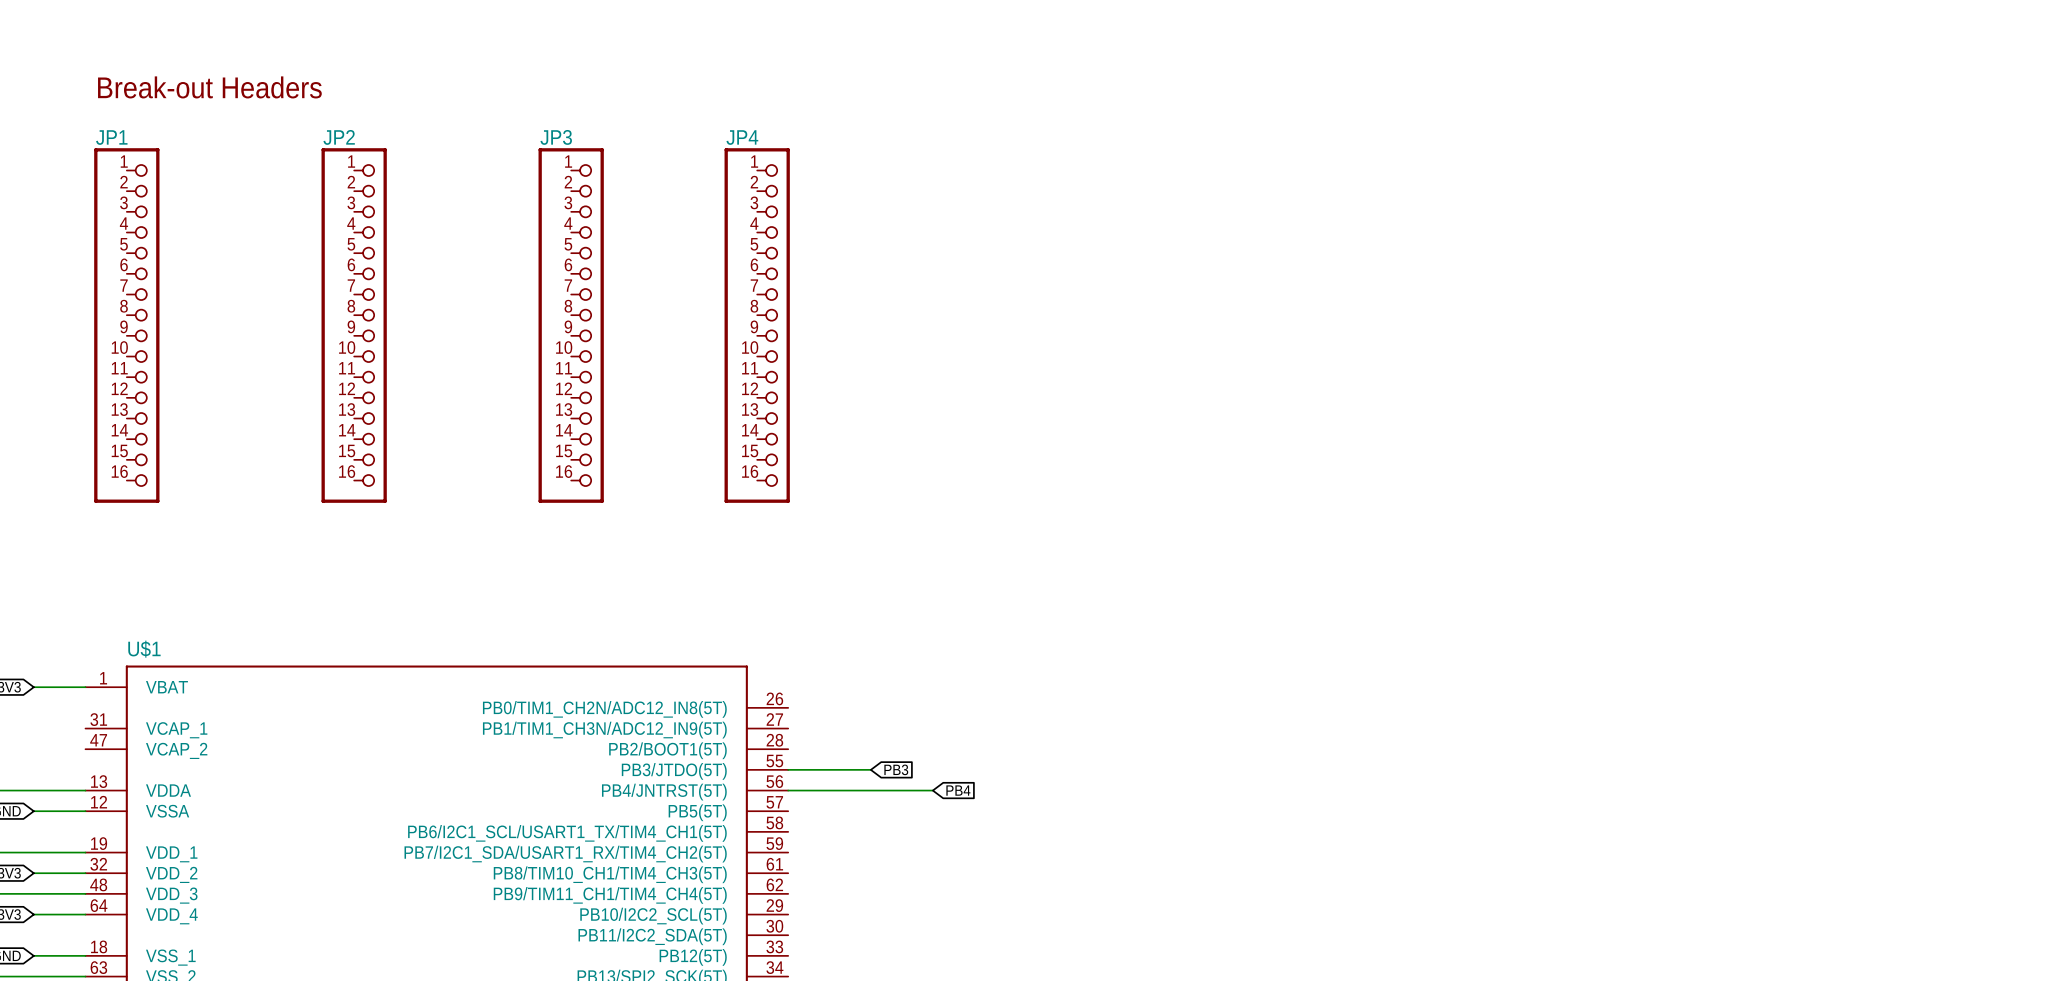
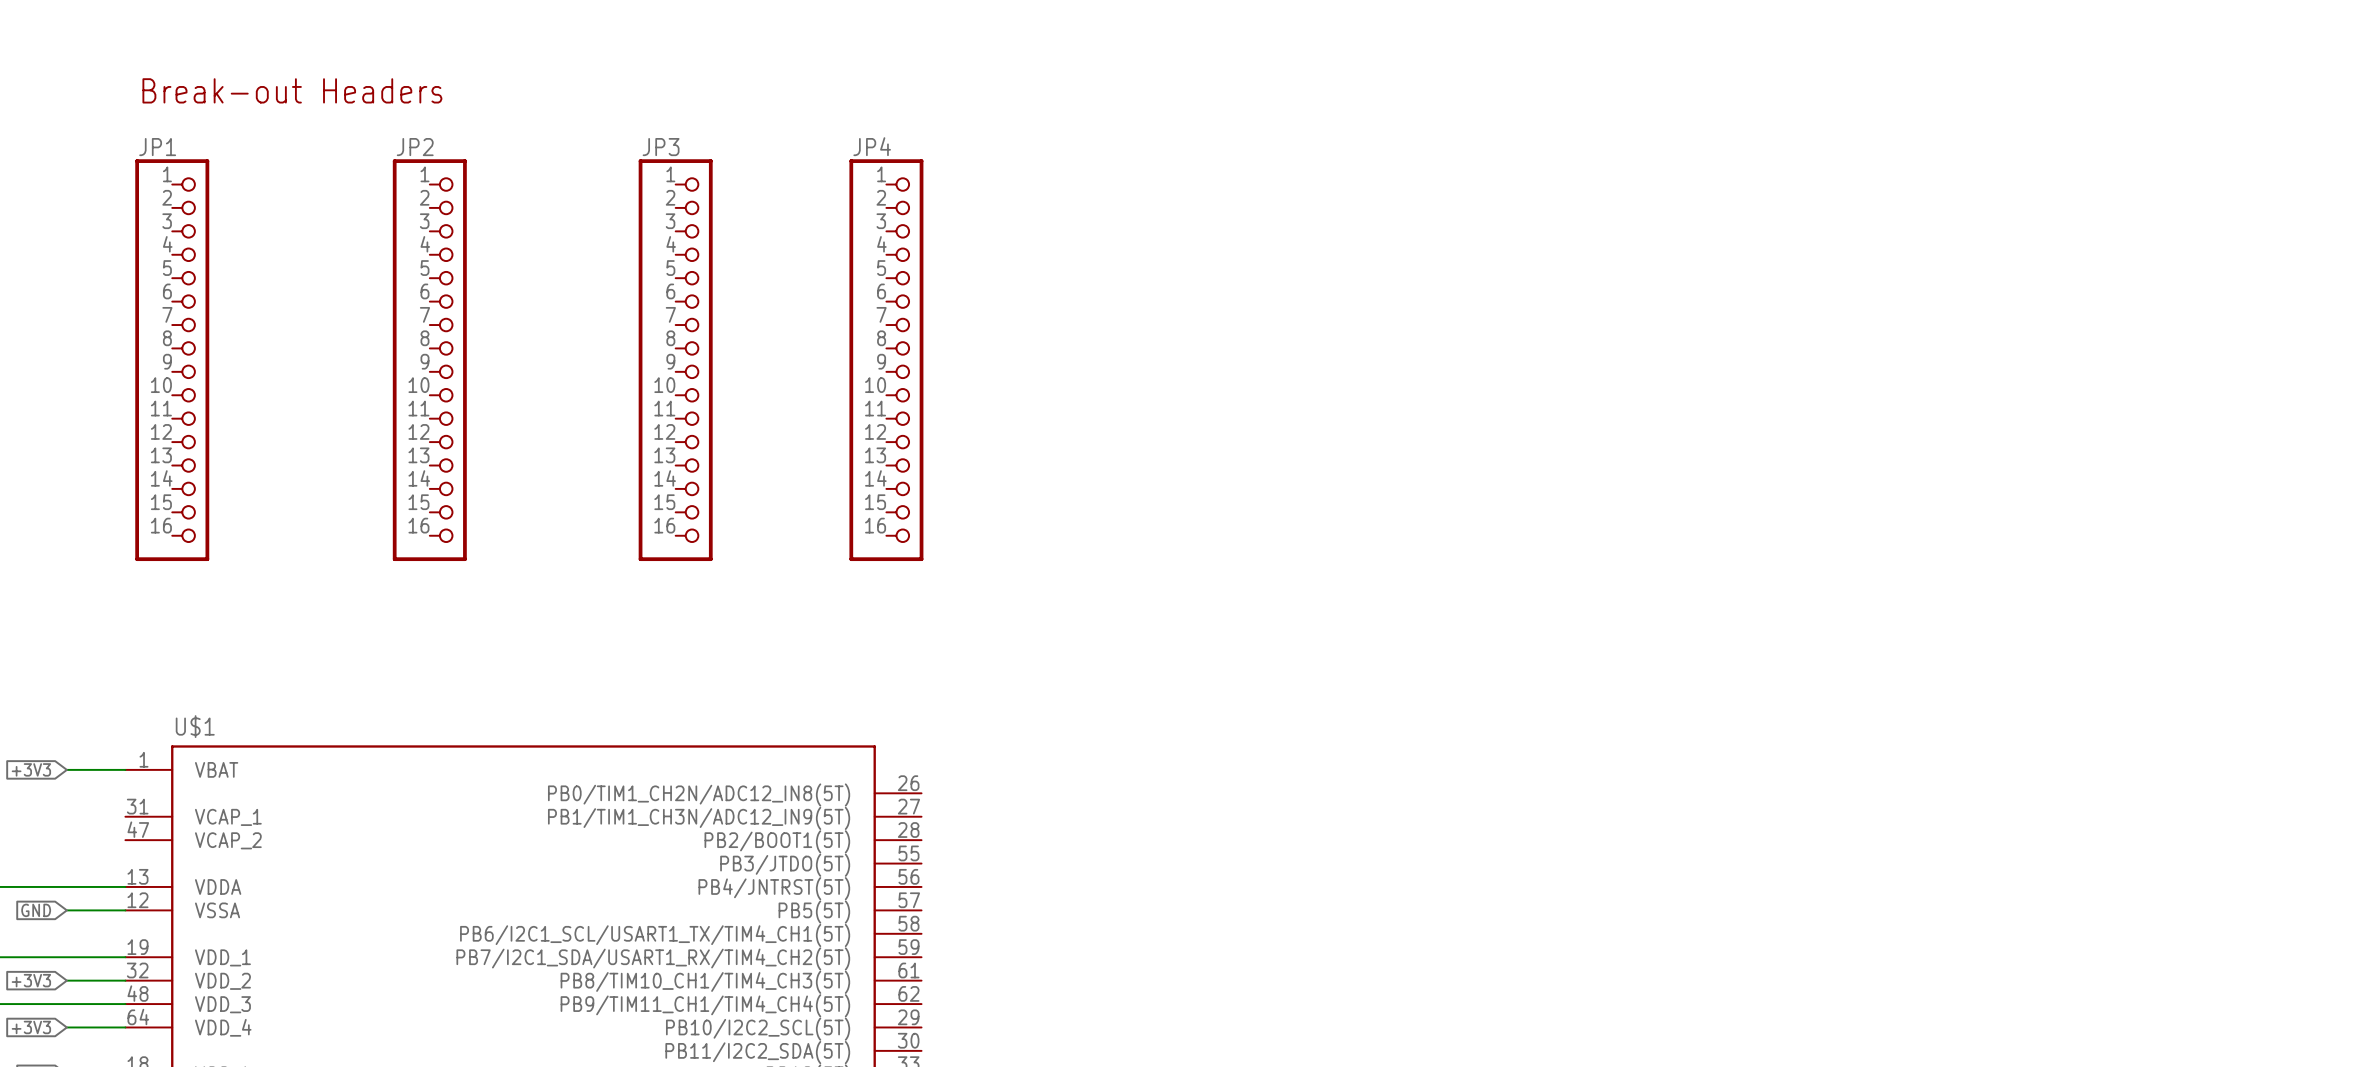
wire: (788, 769) (870, 769) -> none
global label: PB3 (896, 769) -> none
wire: (788, 790) (932, 790) -> none
global label: PB4 (958, 790) -> none

